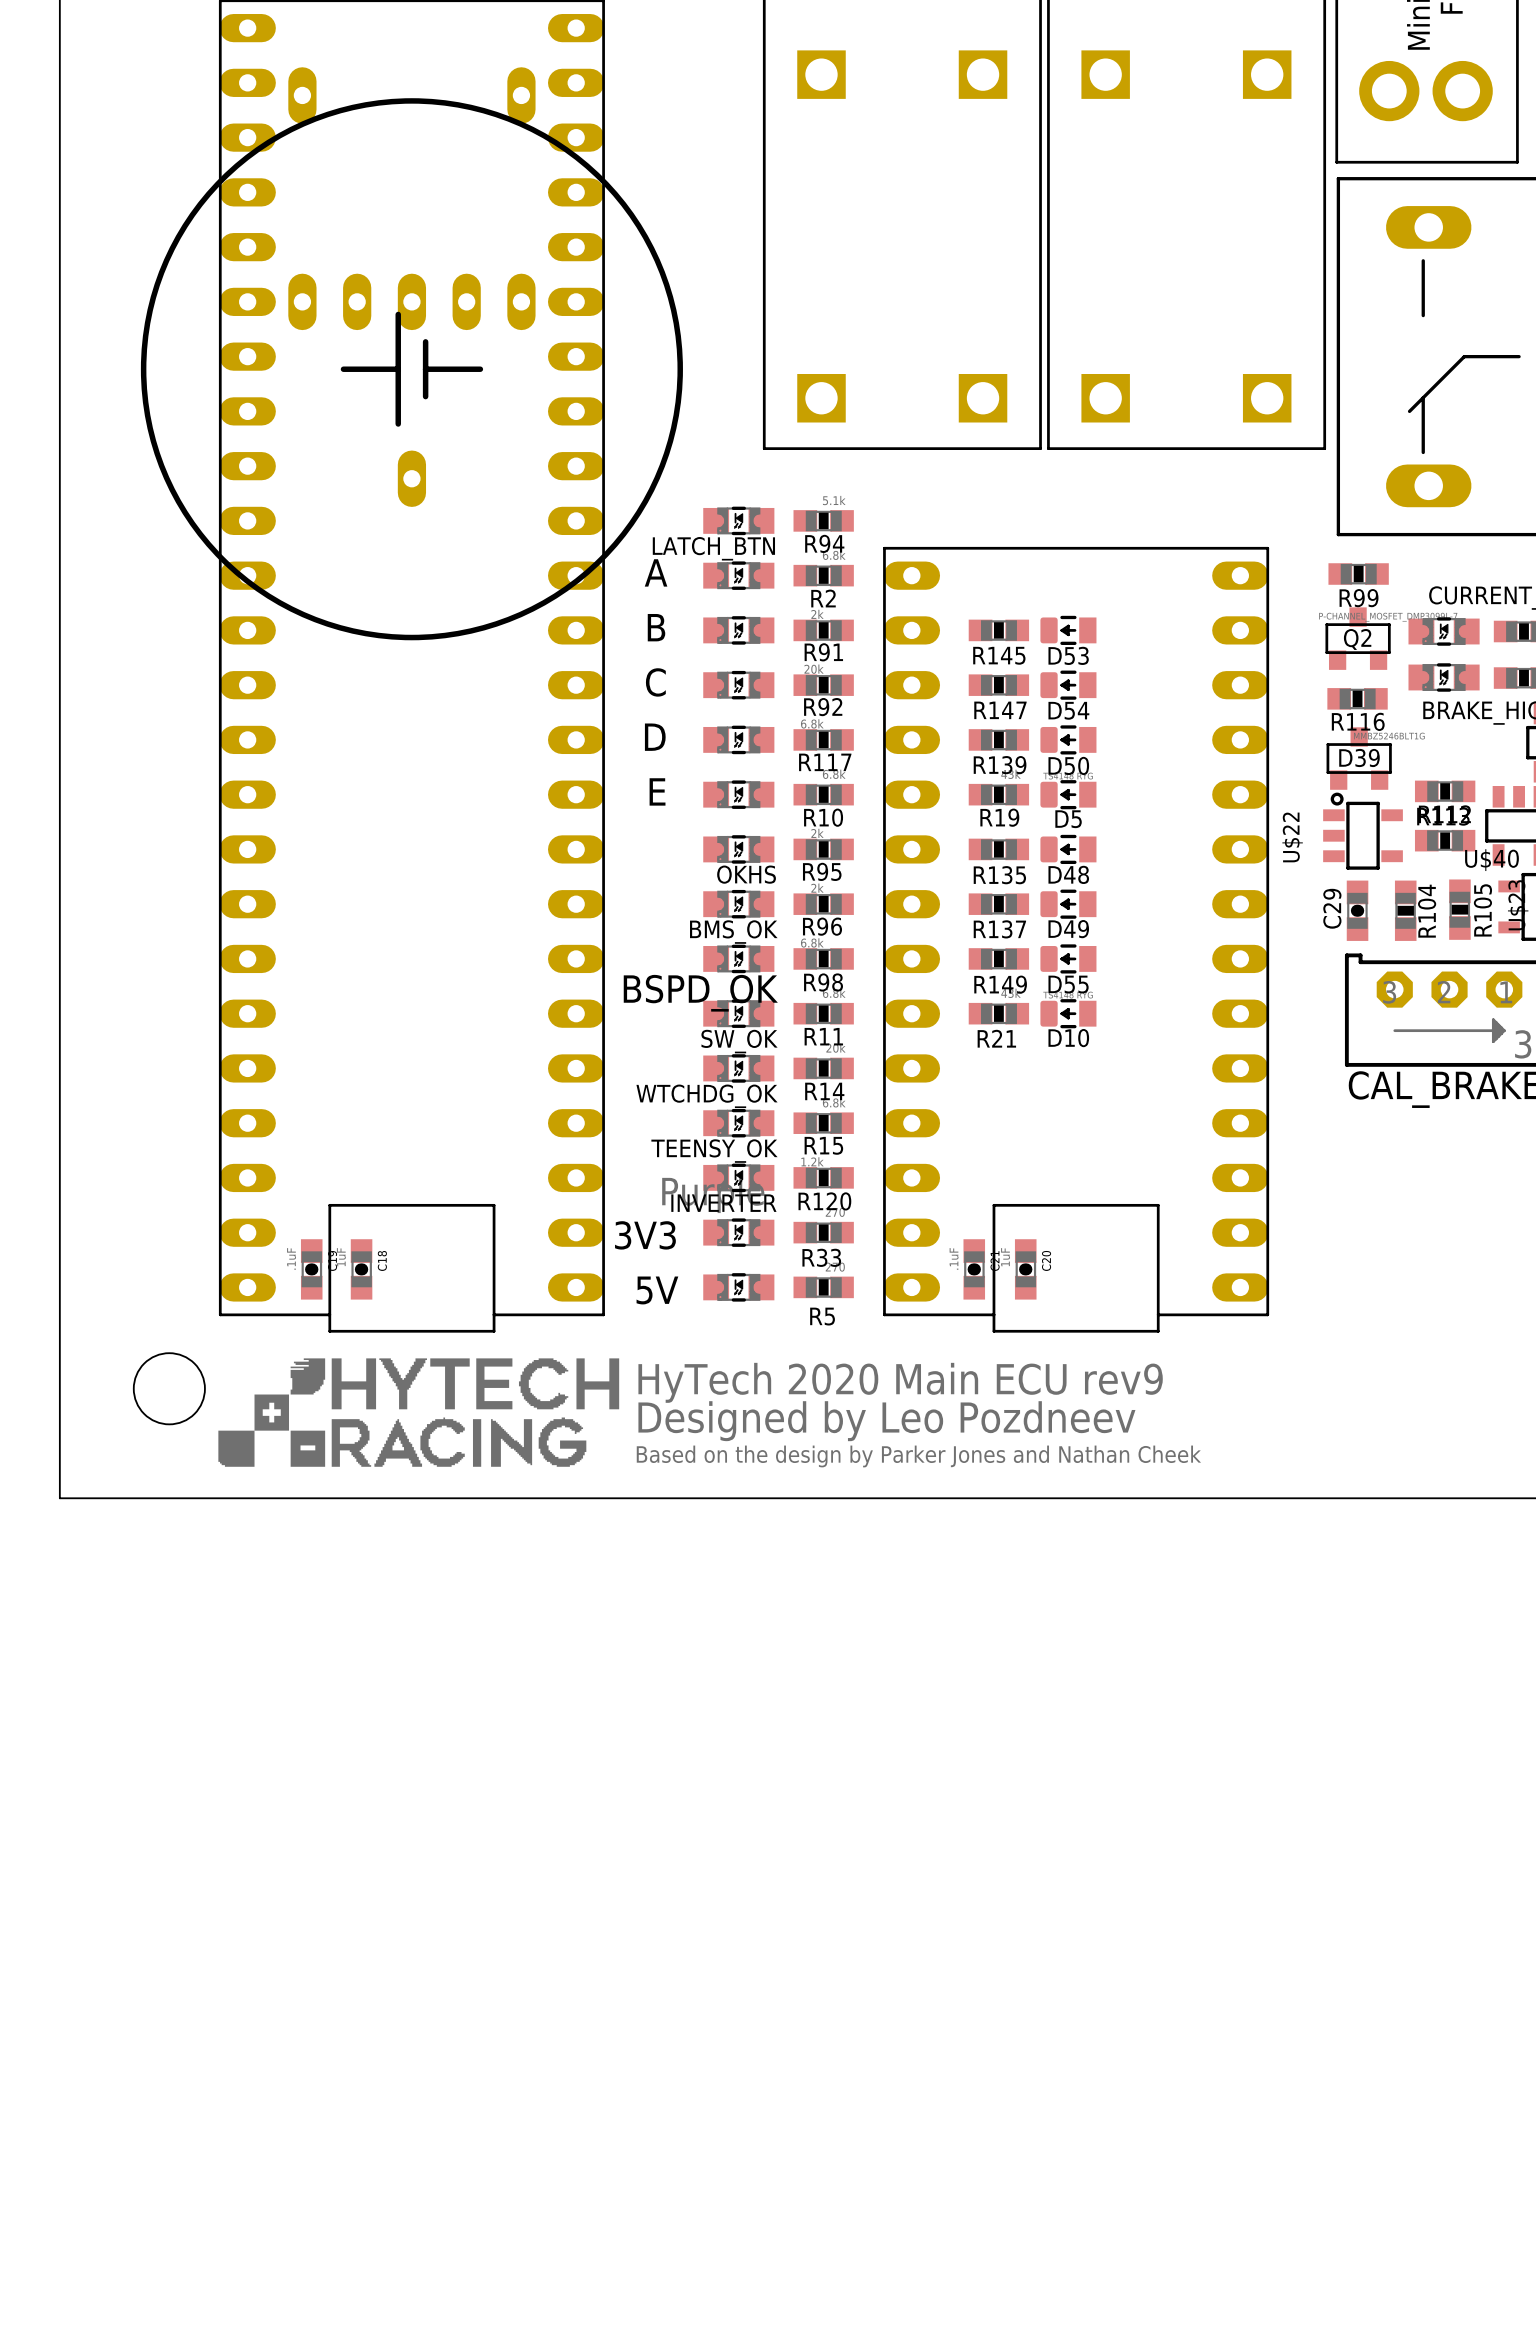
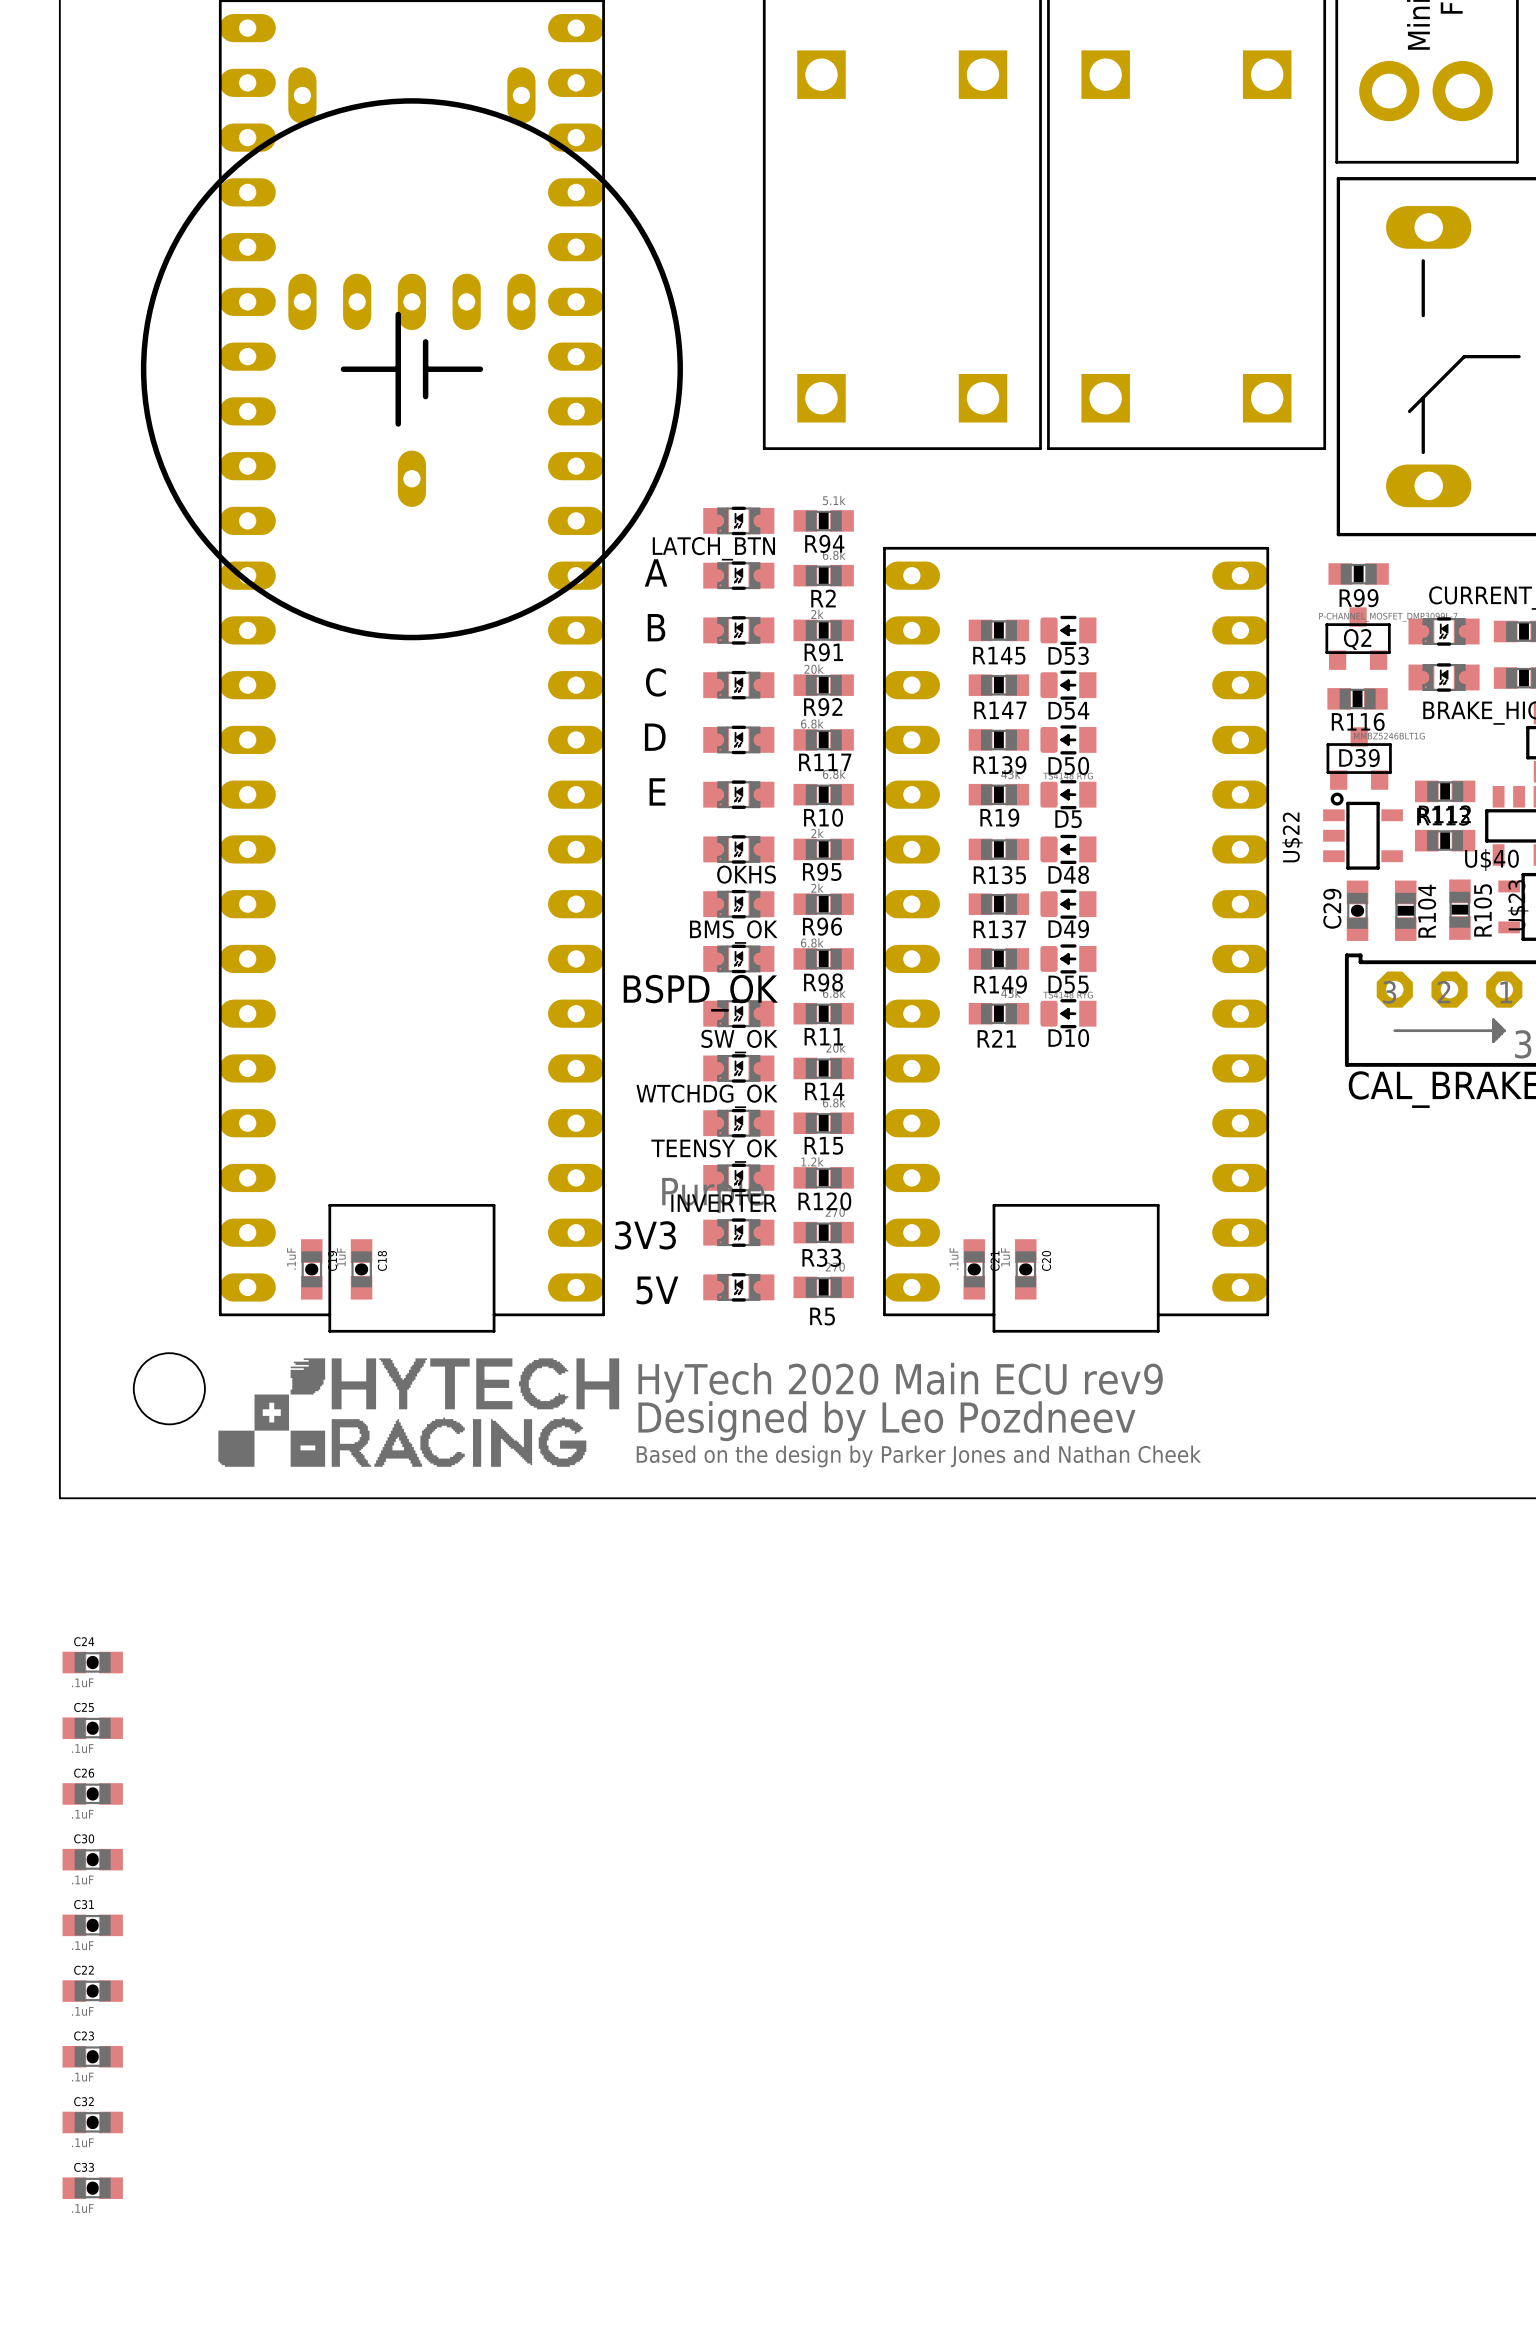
C24: none -> .1uF (92, 1662)
C25: none -> .1uF (92, 1728)
C26: none -> .1uF (92, 1793)
C30: none -> .1uF (92, 1859)
C31: none -> .1uF (92, 1925)
C22: none -> .1uF (92, 1991)
C23: none -> .1uF (92, 2056)
C32: none -> .1uF (92, 2122)
C33: none -> .1uF (92, 2188)

